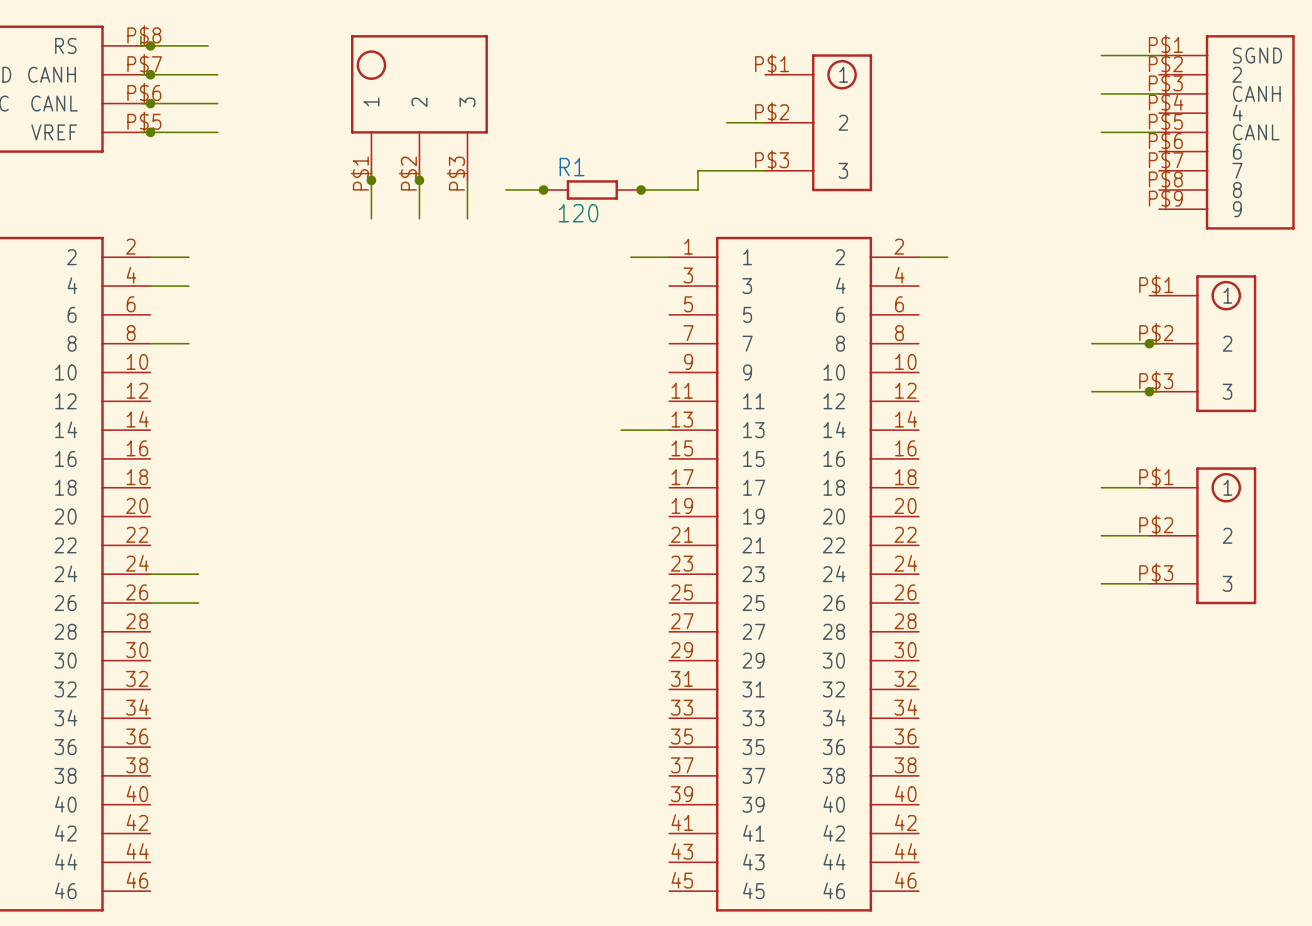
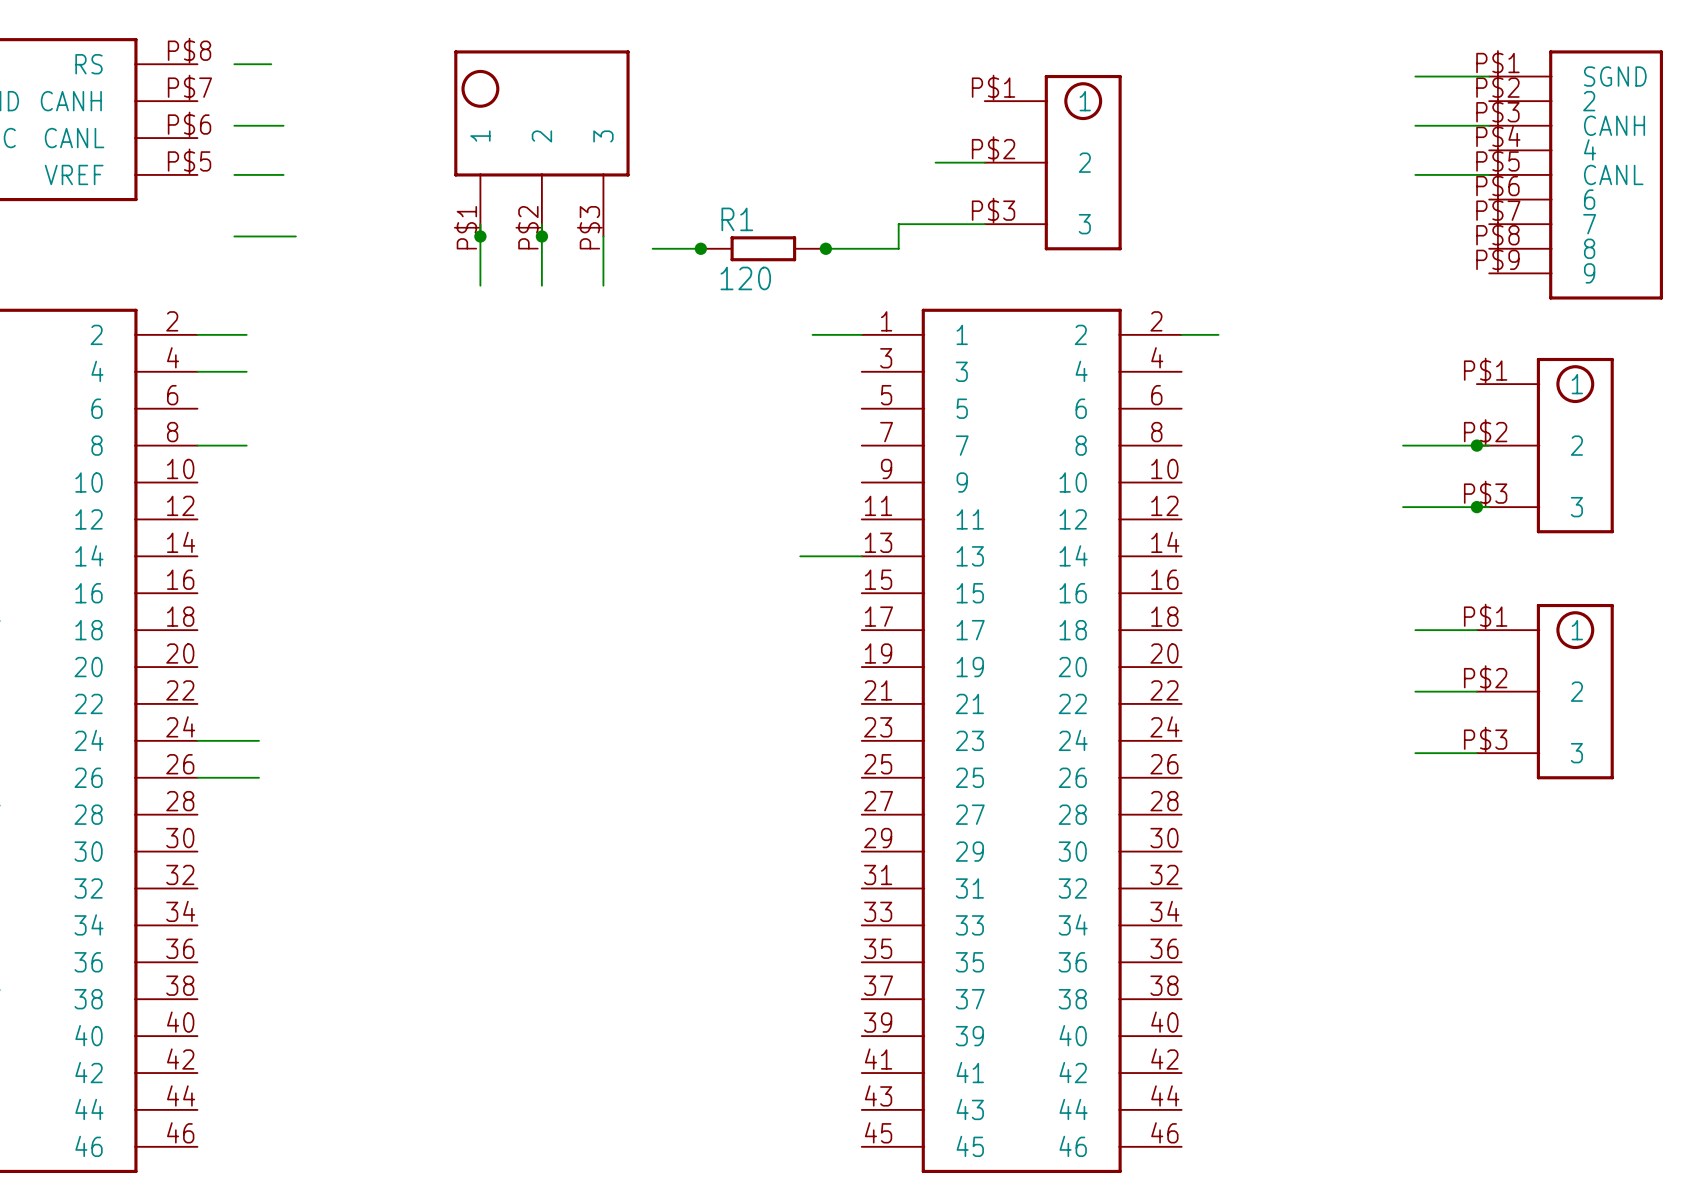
wire: (140, 36) (140, 45) (179, 45) -> none
junction: (150, 45) -> none
wire: (140, 74) (217, 74) -> none
junction: (150, 74) -> none
wire: (140, 103) (217, 103) -> none
junction: (150, 103) -> none
wire: (140, 132) (179, 132) -> (234, 125) (283, 125)
junction: (150, 132) -> none
wire: none -> (234, 236) (295, 236)

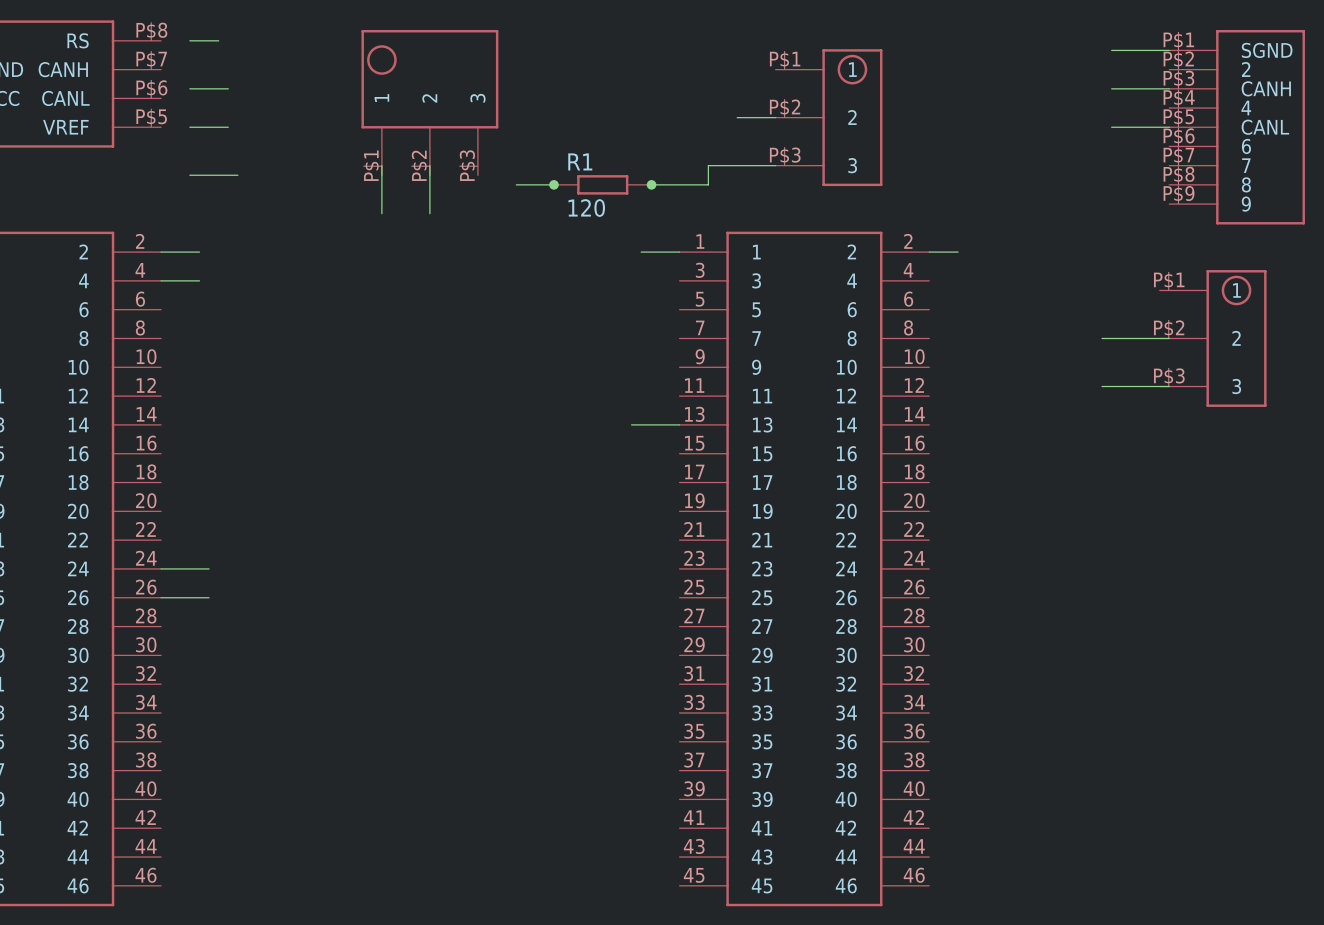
junction: (480, 236) -> none
junction: (541, 236) -> none
wire: (603, 236) (603, 285) -> none
wire: (197, 445) (246, 445) -> none
junction: (1476, 445) -> none
junction: (1476, 507) -> none
wire: (1415, 630) (1476, 630) -> none
wire: (1415, 691) (1476, 691) -> none
part: (1545, 691) -> none
wire: (1415, 753) (1476, 753) -> none

